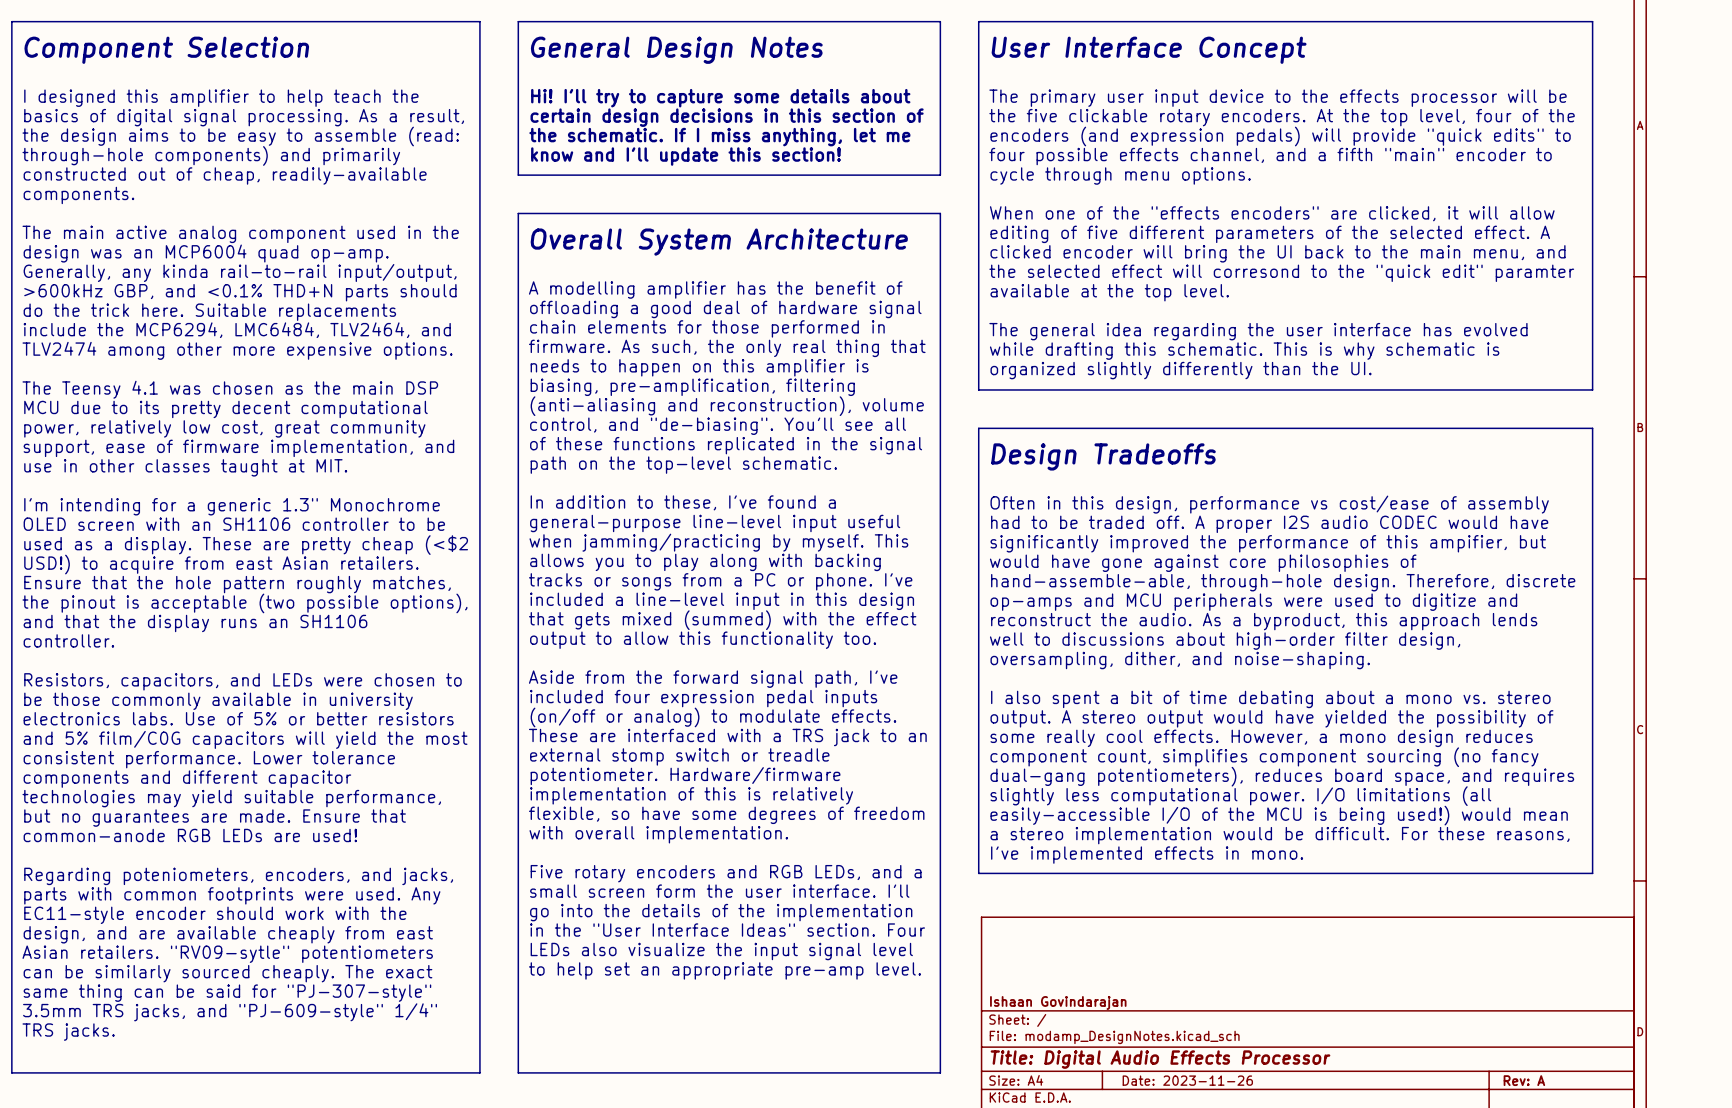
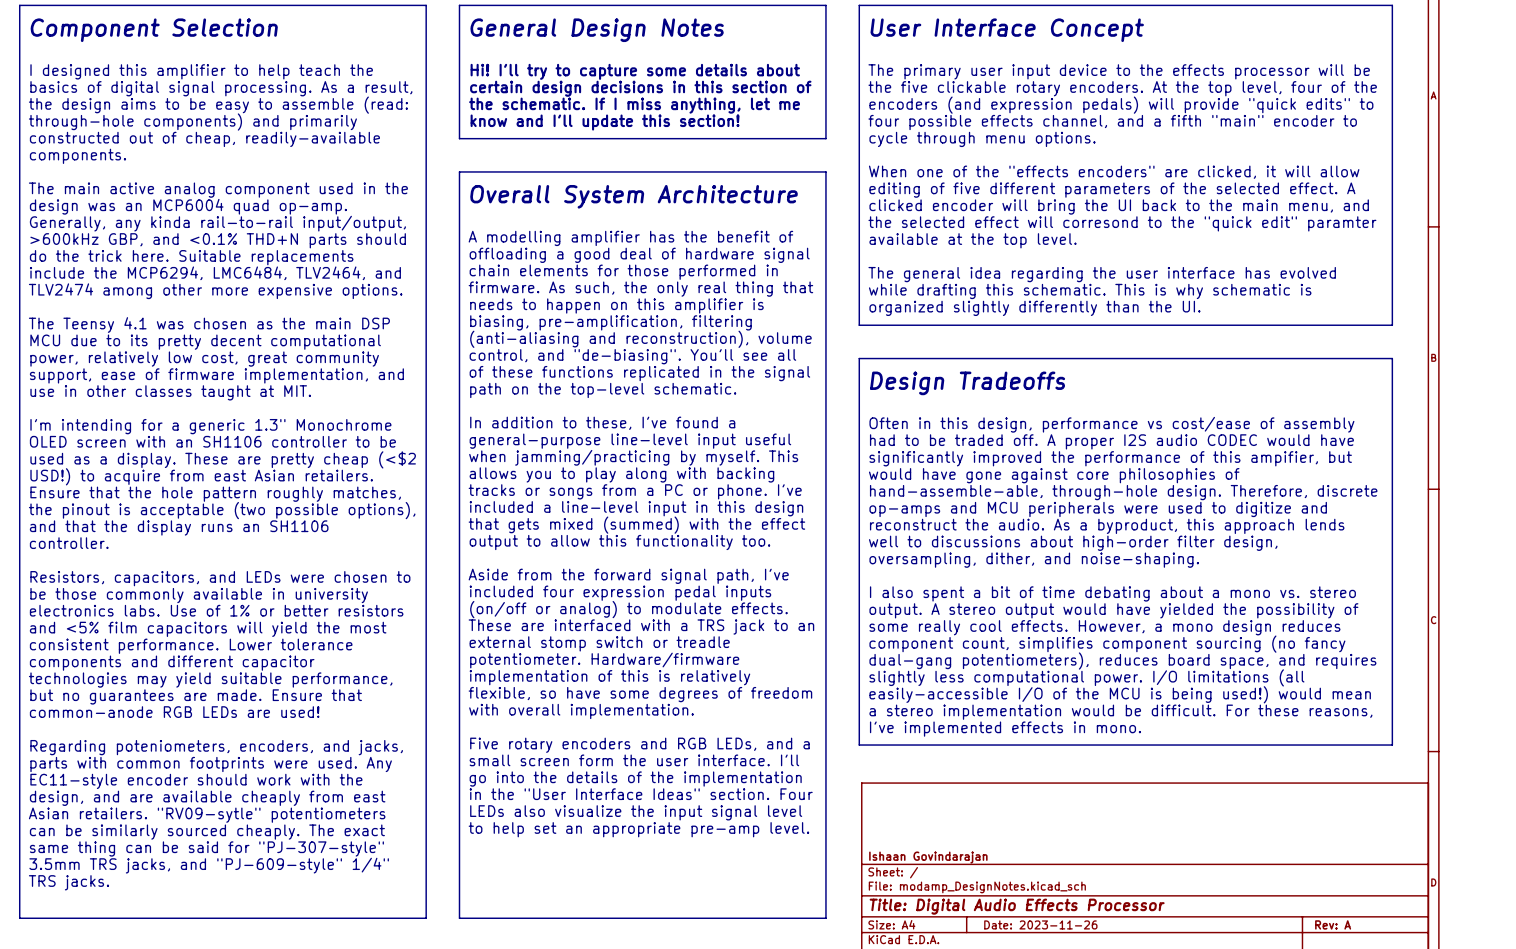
text: electronics labs. Use of 5% or better resistors (238, 718) -> electronics labs. Use of 1% or better resistors (216, 610)
text: and 5% film/C0G capacitors will yield the most (245, 739) -> and <5% film capacitors will yield the most (208, 629)

